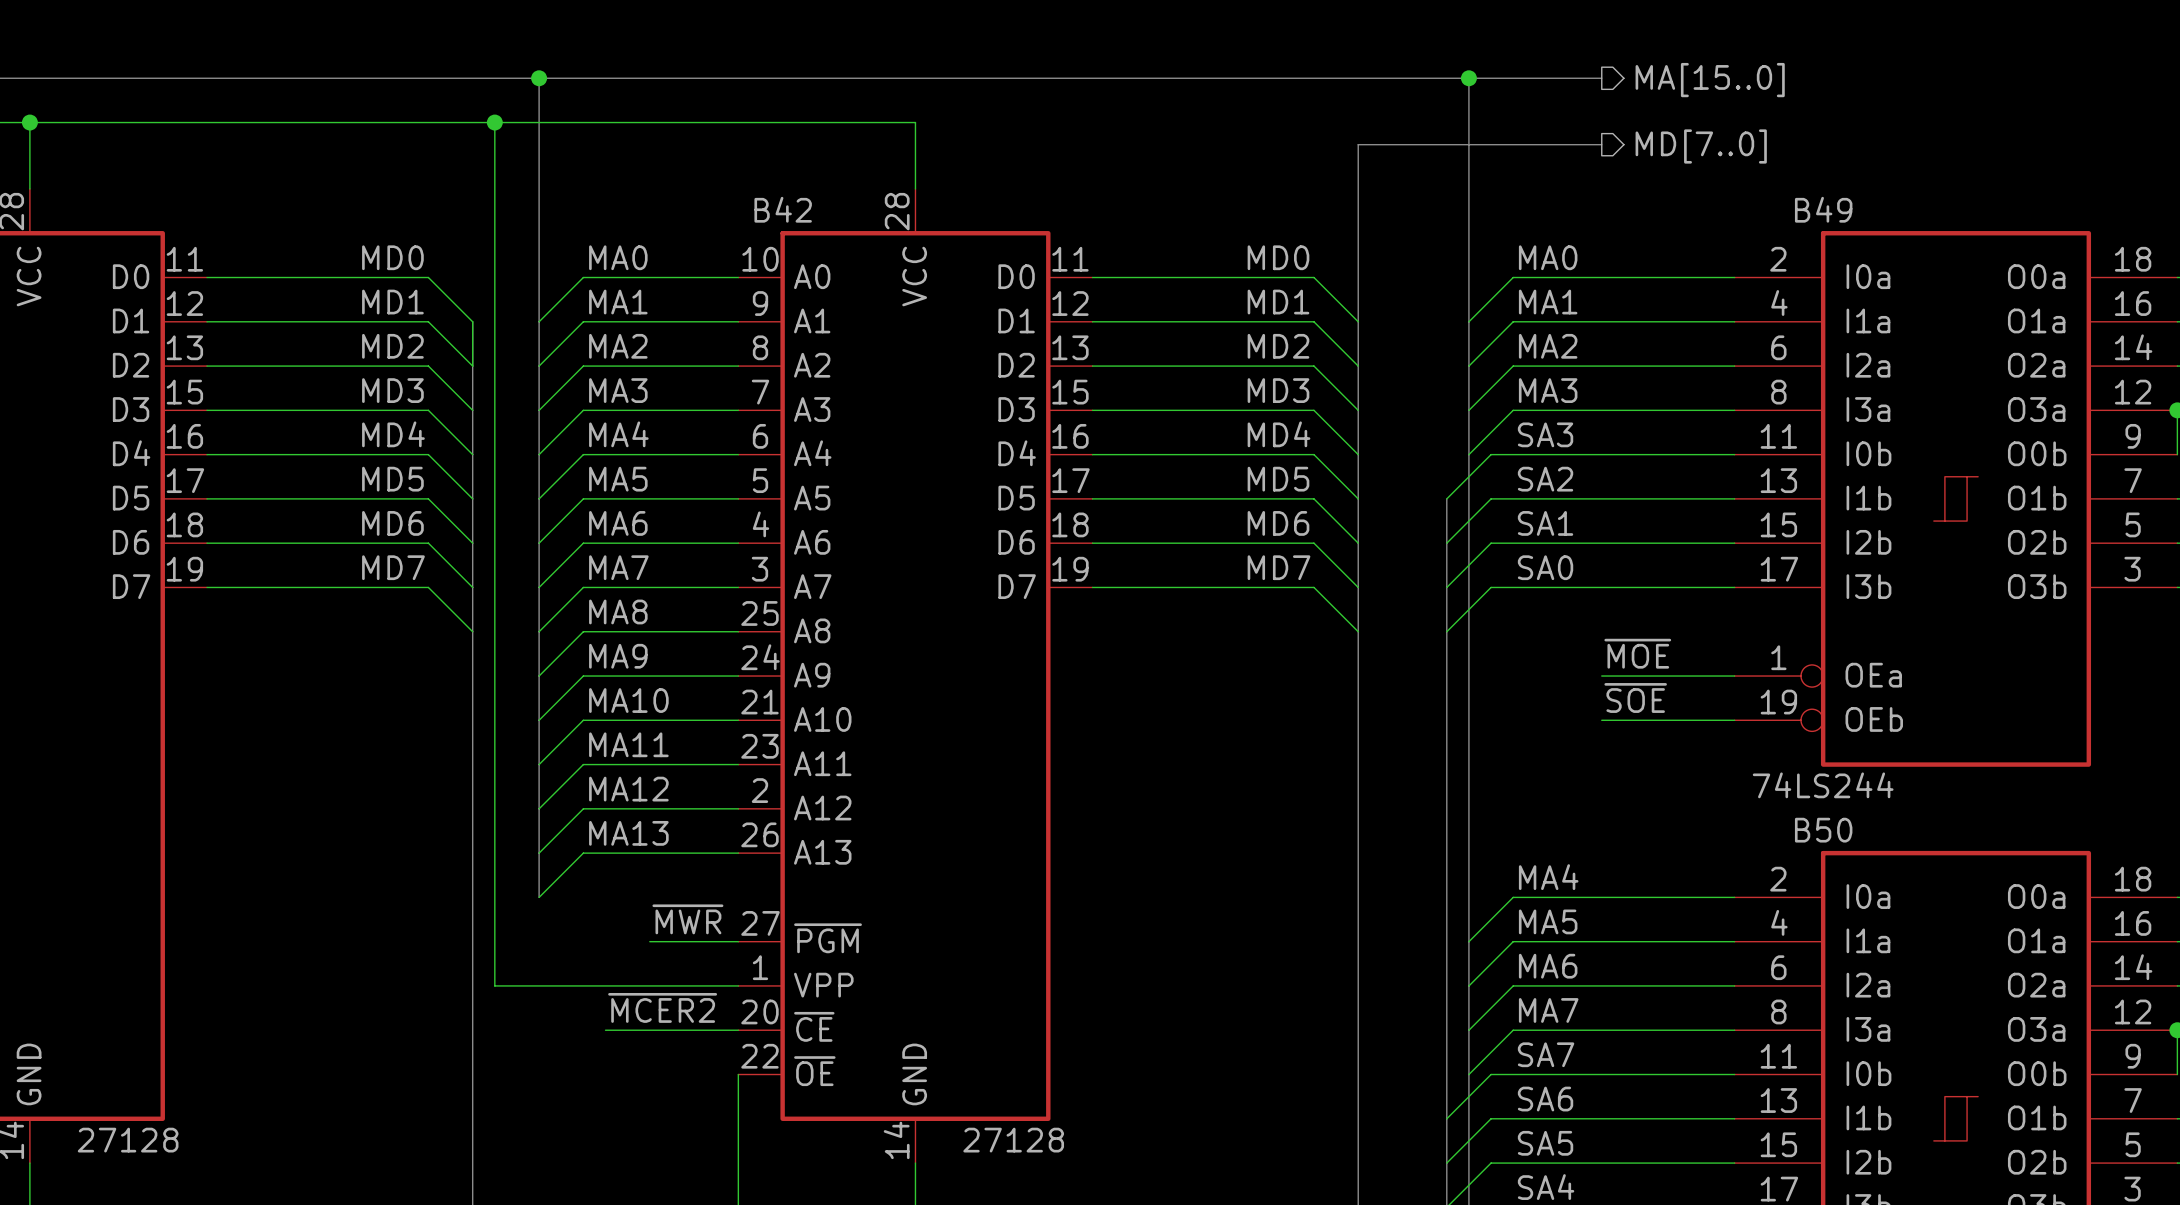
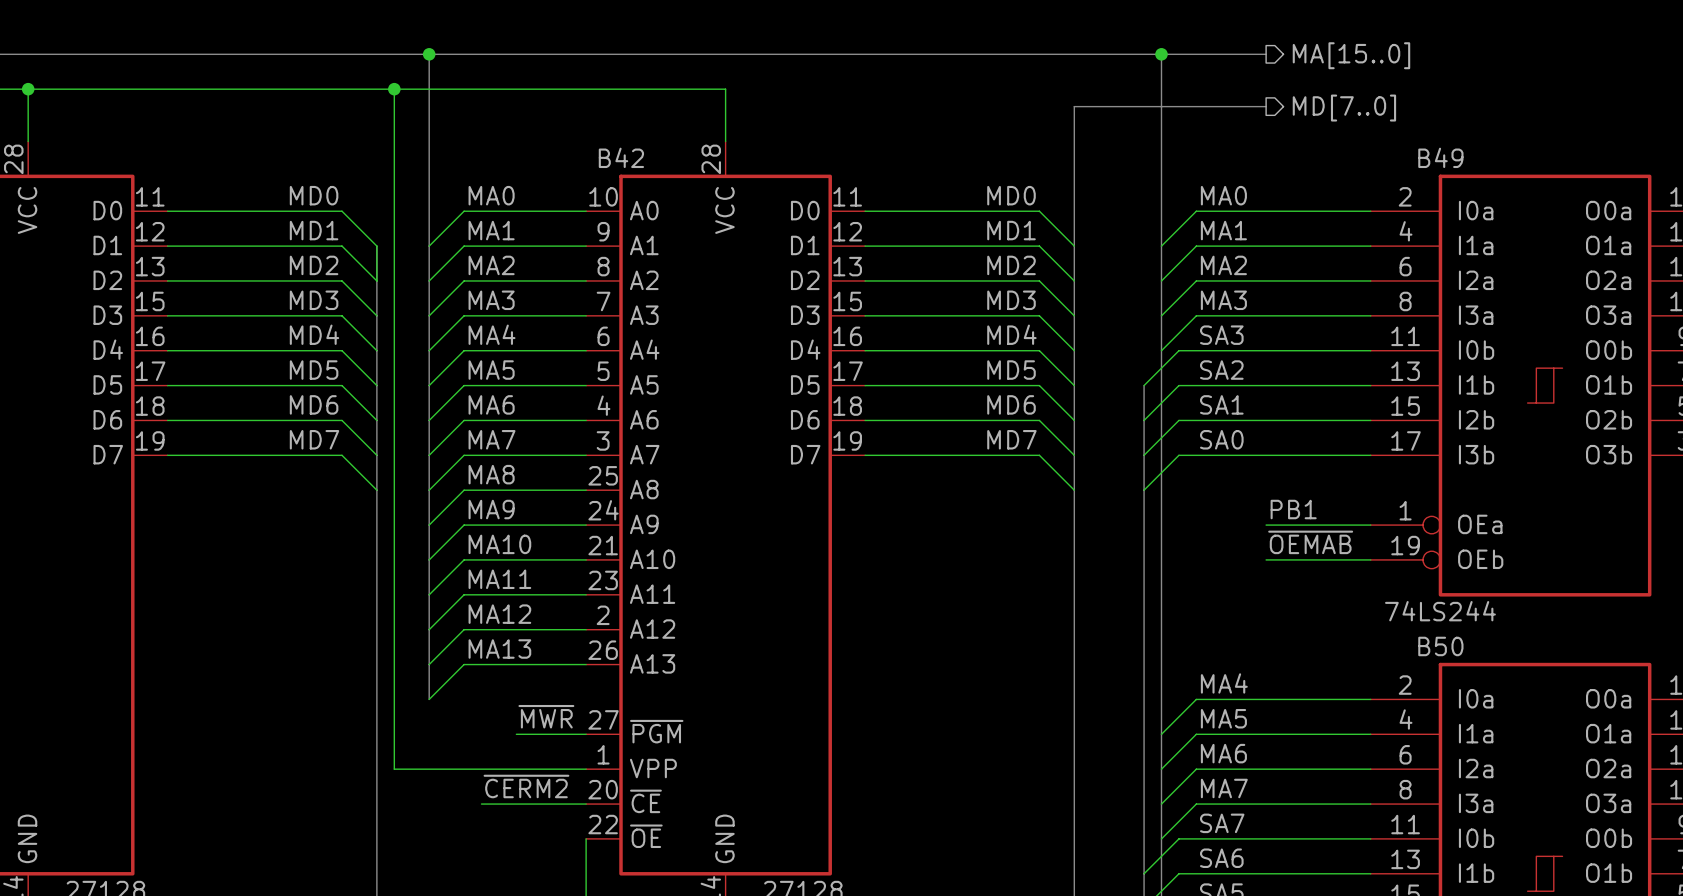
label: ~{MOE} (1637, 653) -> PB1 (1293, 509)
label: ~{SOE} (1635, 697) -> ~{OEMAB} (1310, 542)
label: ~{MCER2} (662, 1007) -> ~{CERM2} (526, 786)

